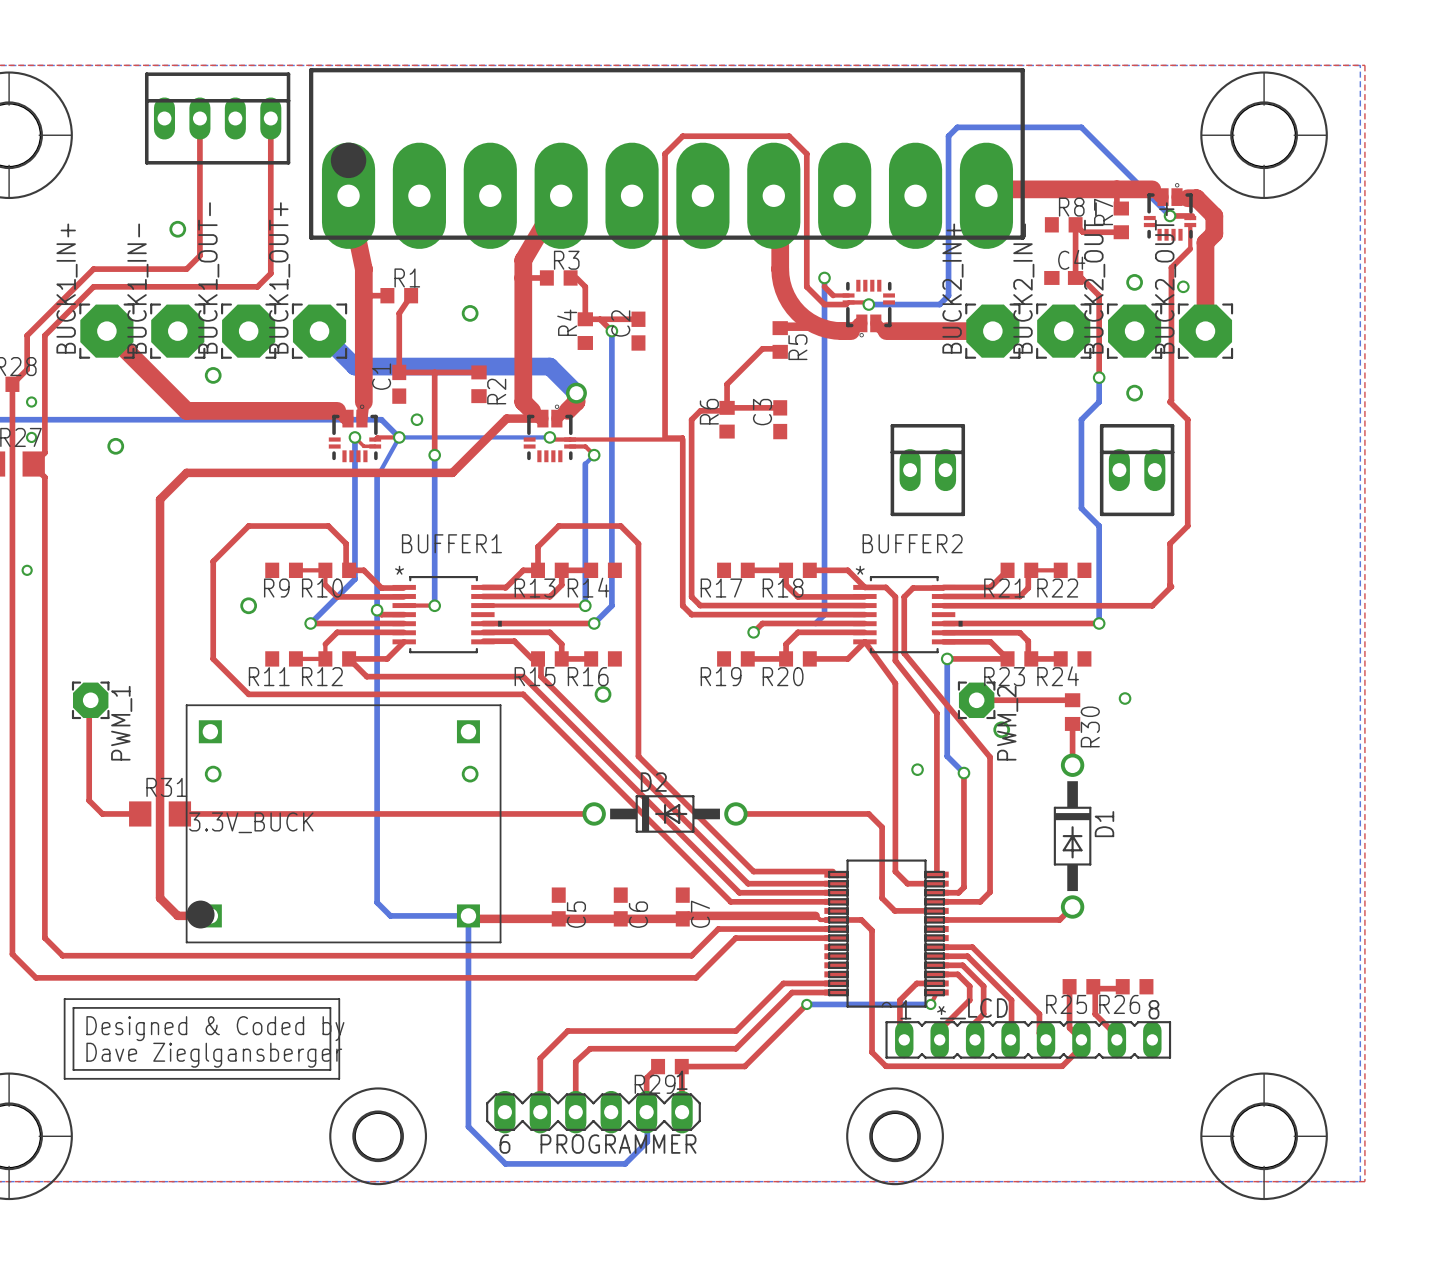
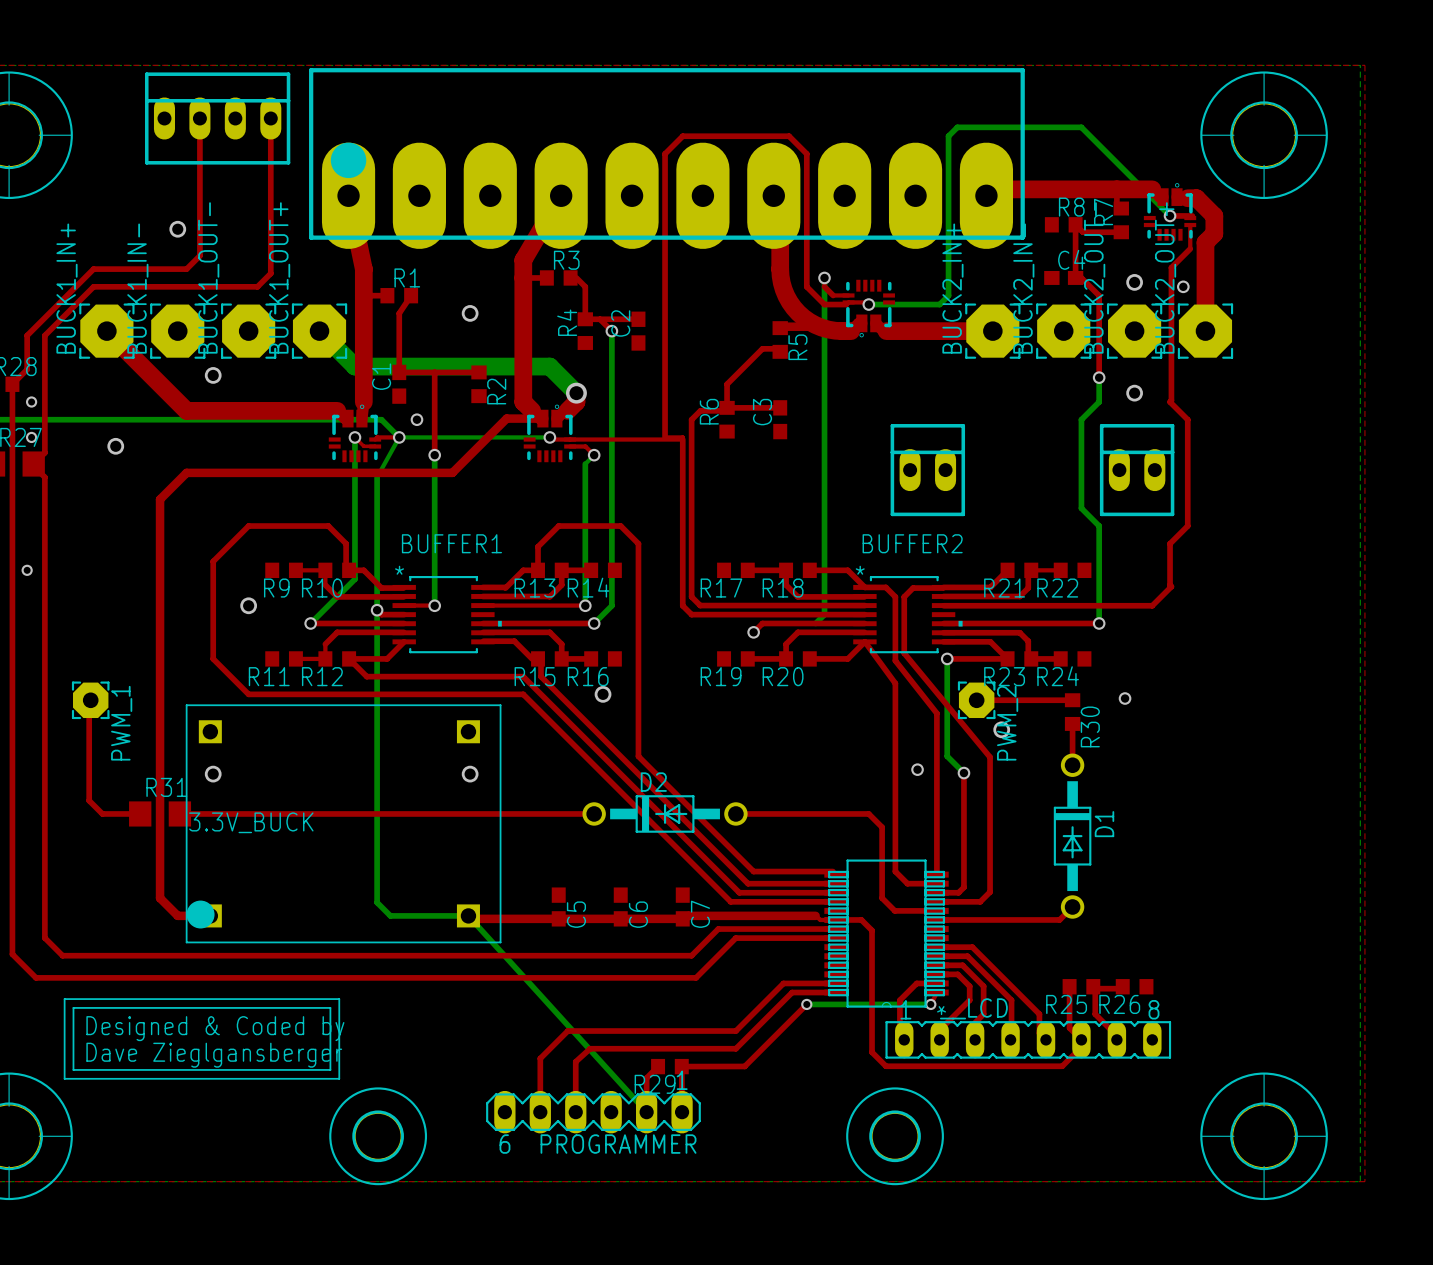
bottom track: (468, 915) (468, 1126) (505, 1163) (625, 1163) (647, 1141) (646, 1112) -> (468, 915) (646, 1112)

